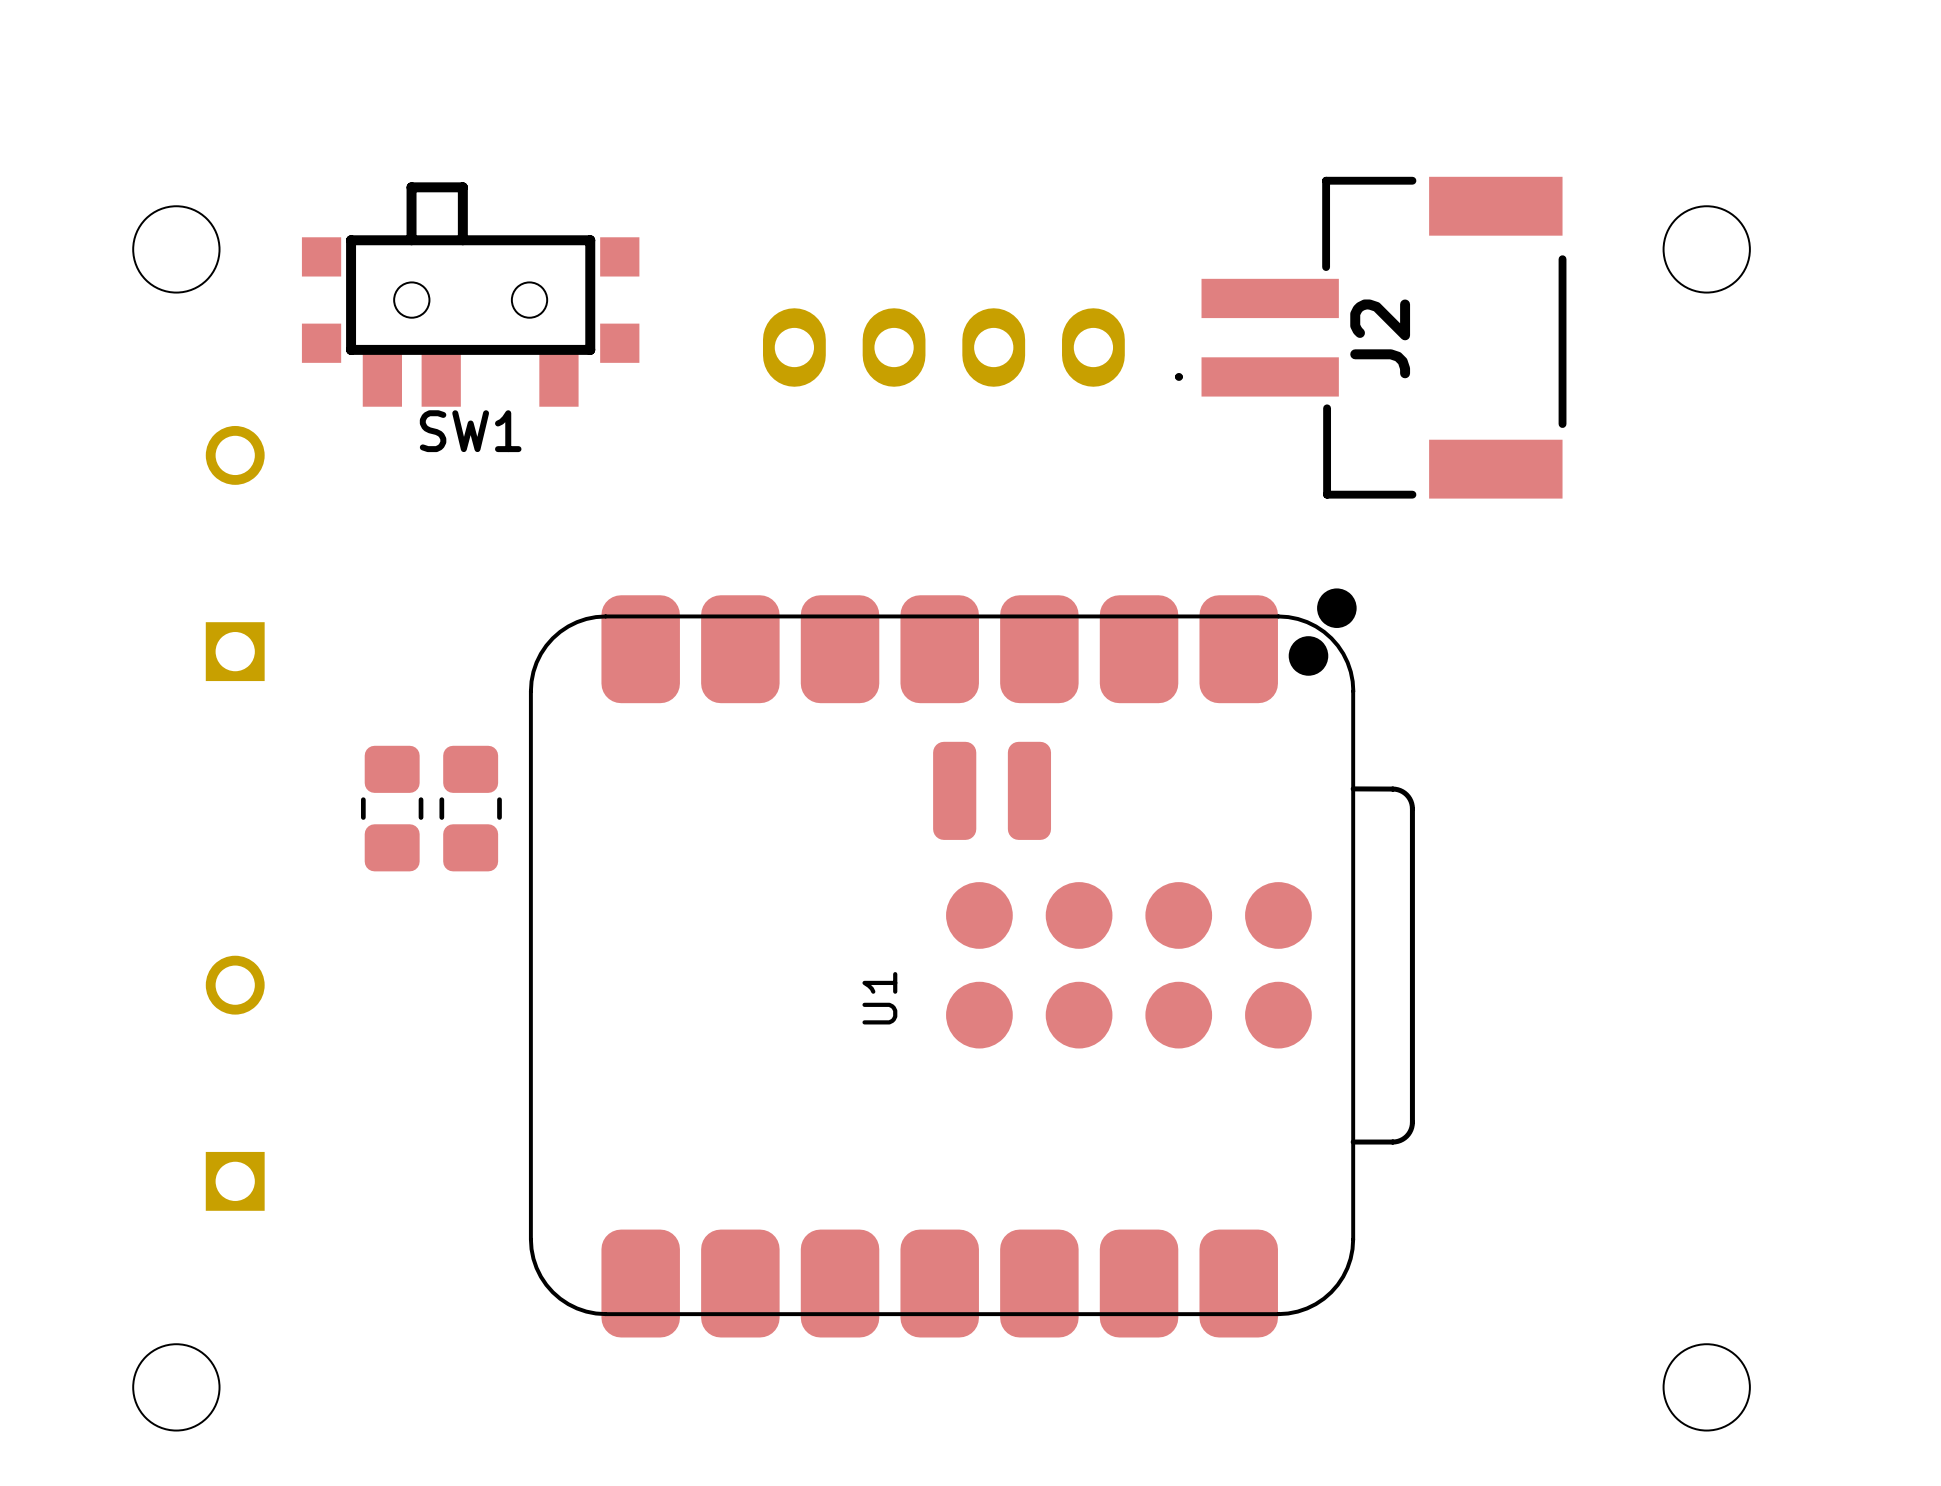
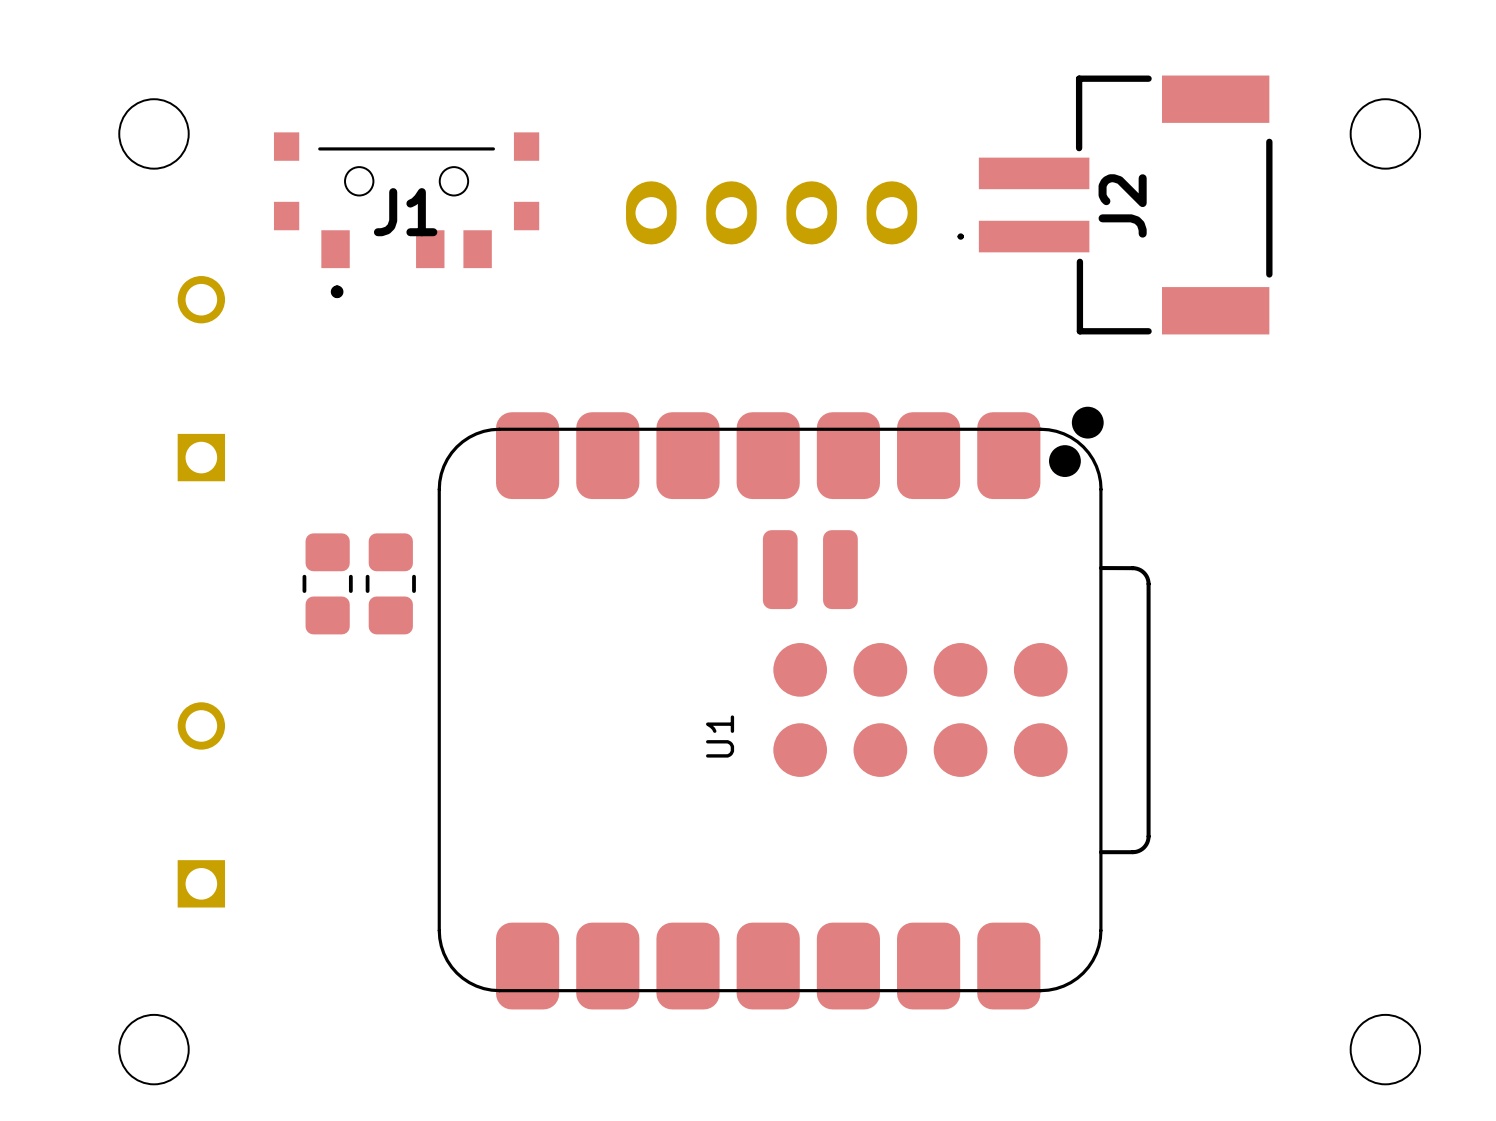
SW1: (470, 294) -> none
J1: none -> (406, 215)

